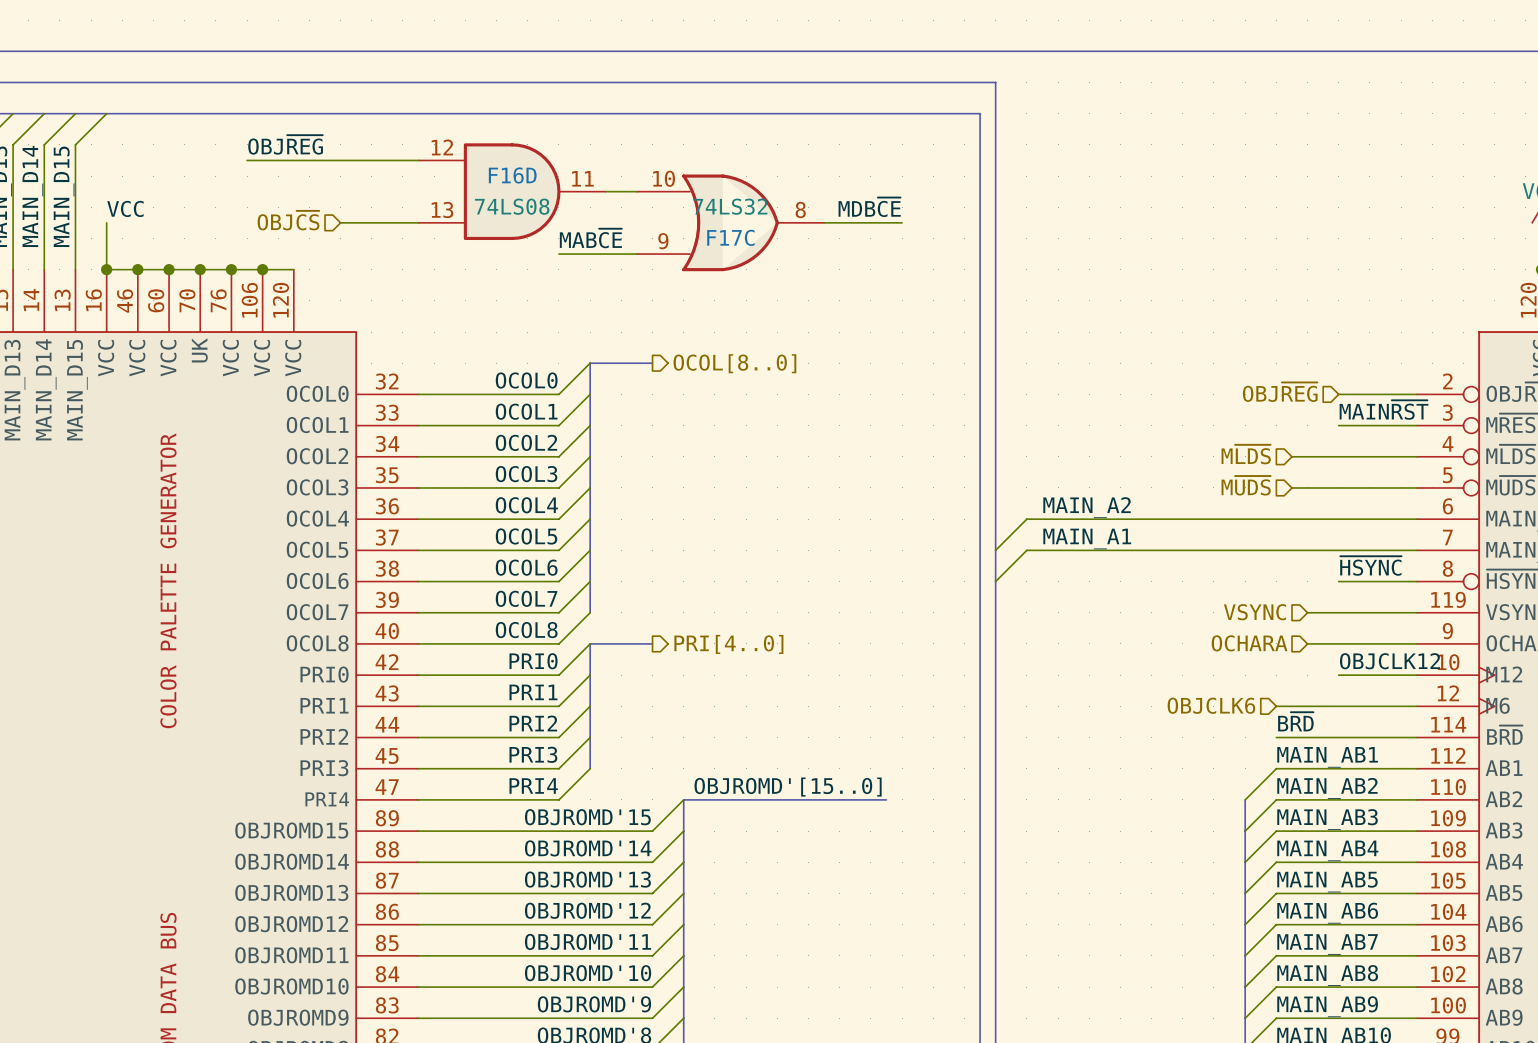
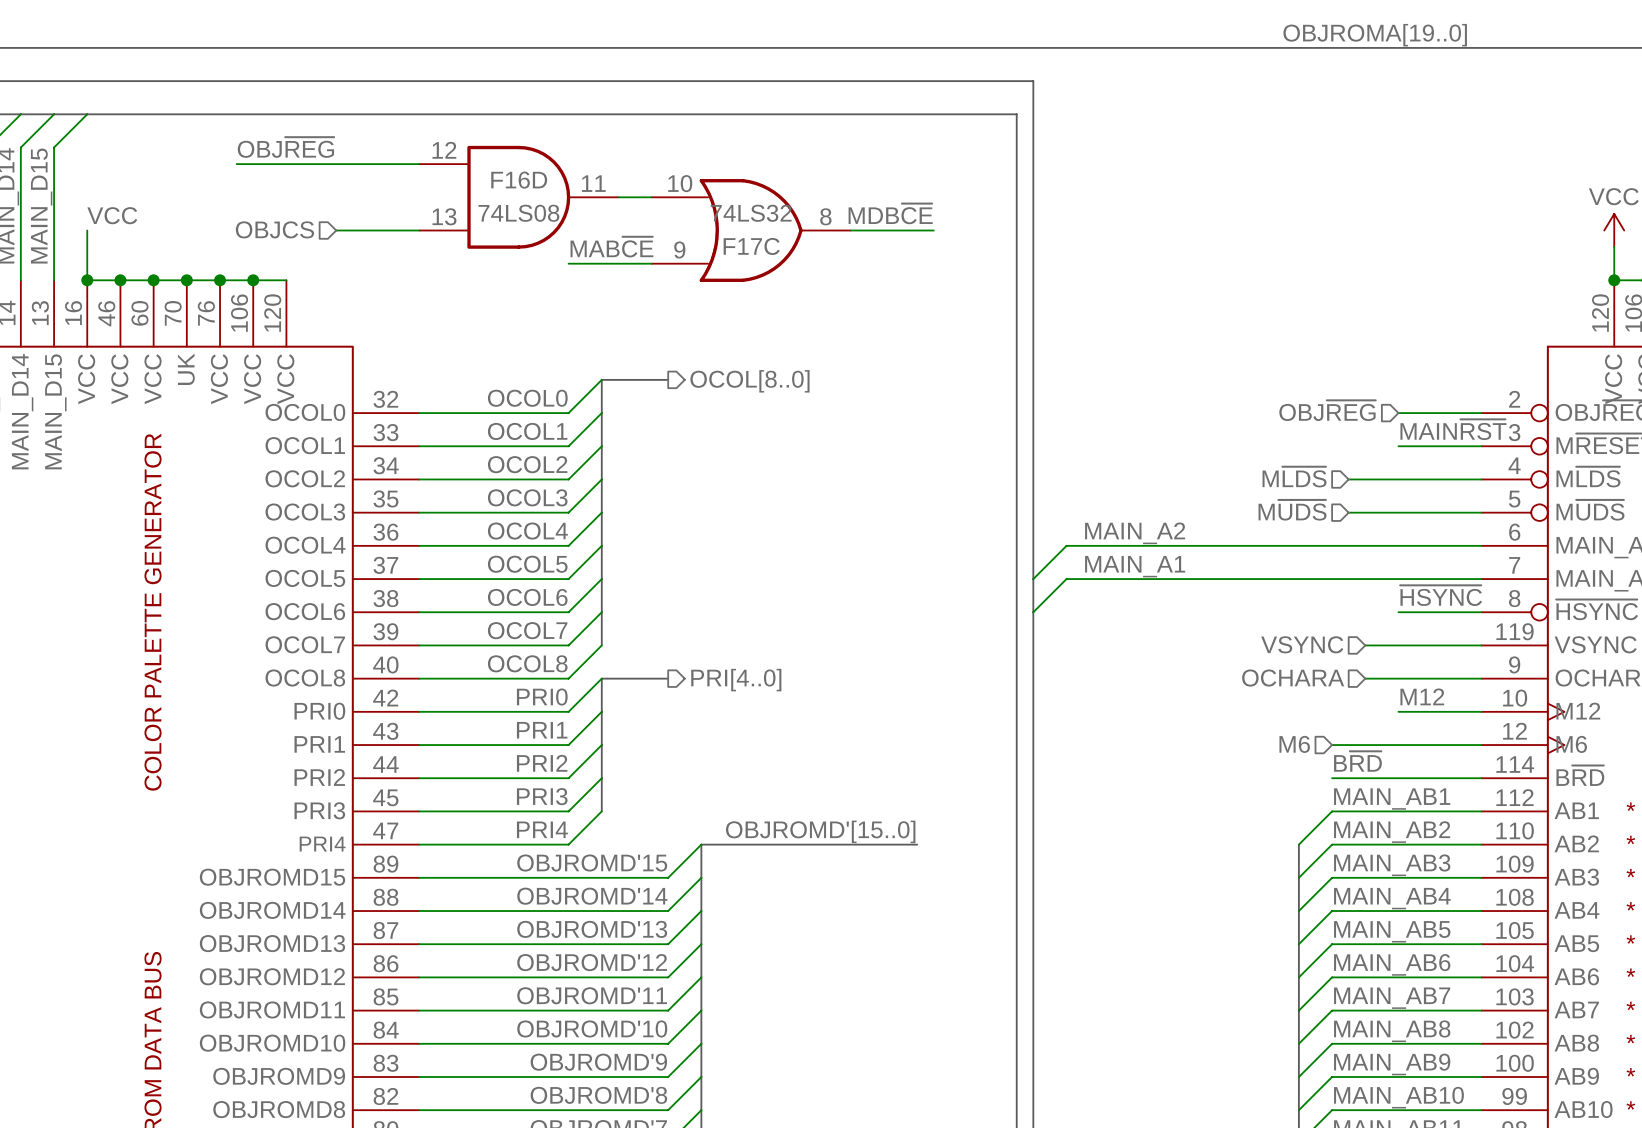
label: none -> OBJROMA[19..0] (1375, 35)
hierarchical label: OBJ~{CS} (288, 220) -> OBJCS (274, 229)
label: OBJCLK12 (1389, 661) -> M12 (1422, 696)
hierarchical label: OBJCLK6 (1211, 705) -> M6 (1294, 744)

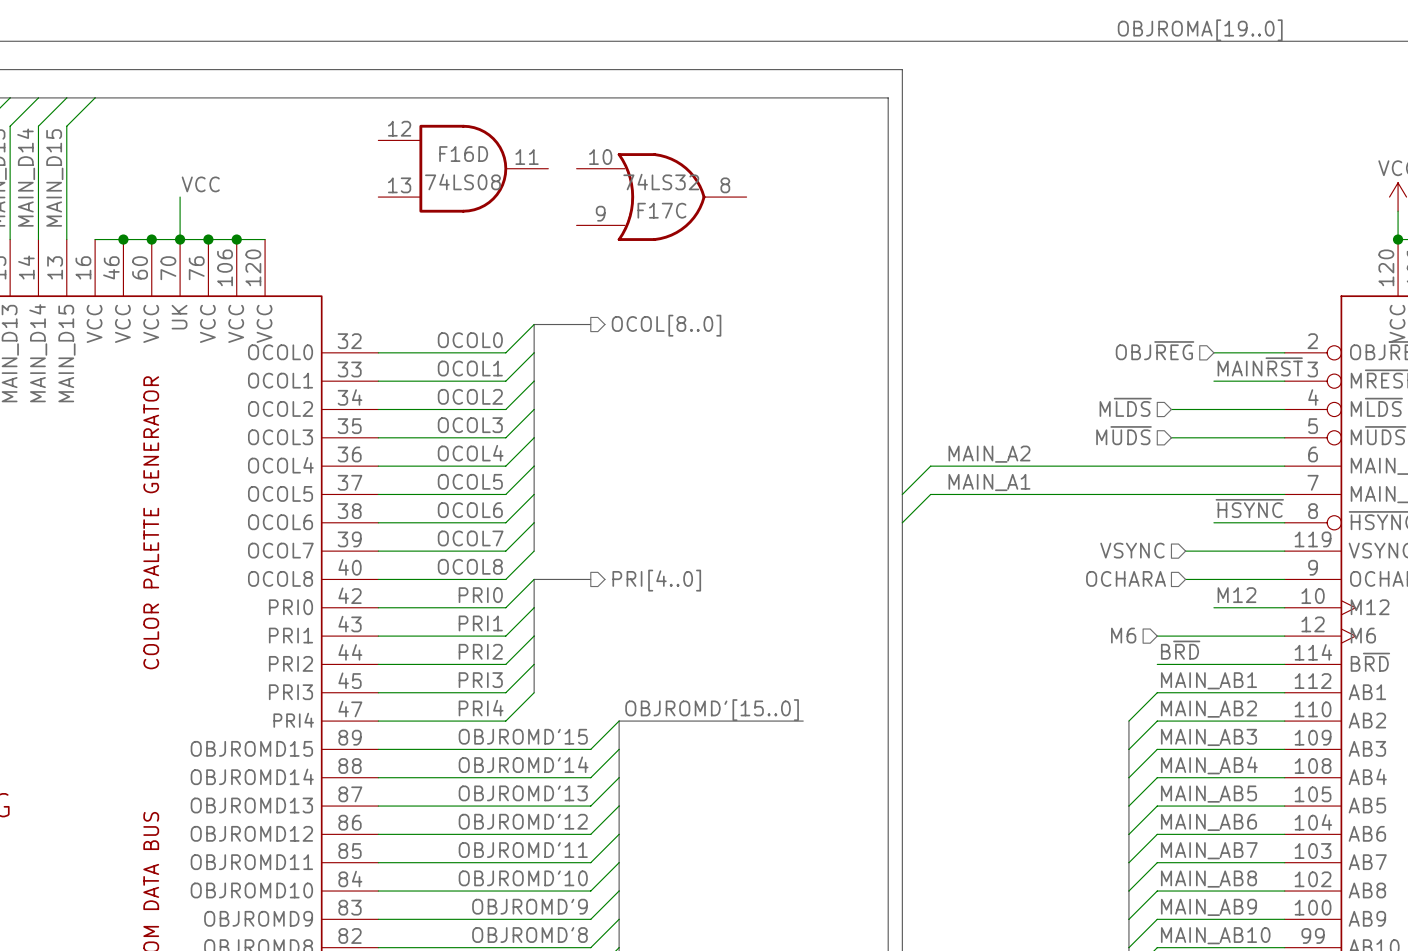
label: OBJ~{REG} (285, 147) -> none
wire: (236, 164) (419, 164) -> none
wire: (618, 197) (651, 197) -> none
label: MDB~{CE} (890, 213) -> none
label position: VCC (112, 215) -> VCC (200, 184)
hierarchical label: OBJCS (274, 229) -> none
wire: (87, 230) (87, 280) -> (180, 197) (180, 239)
wire: (336, 230) (419, 230) -> none
wire: (850, 230) (933, 230) -> none
label: MAB~{CE} (611, 247) -> none
wire: (568, 263) (651, 263) -> none
junction: (87, 280) -> none

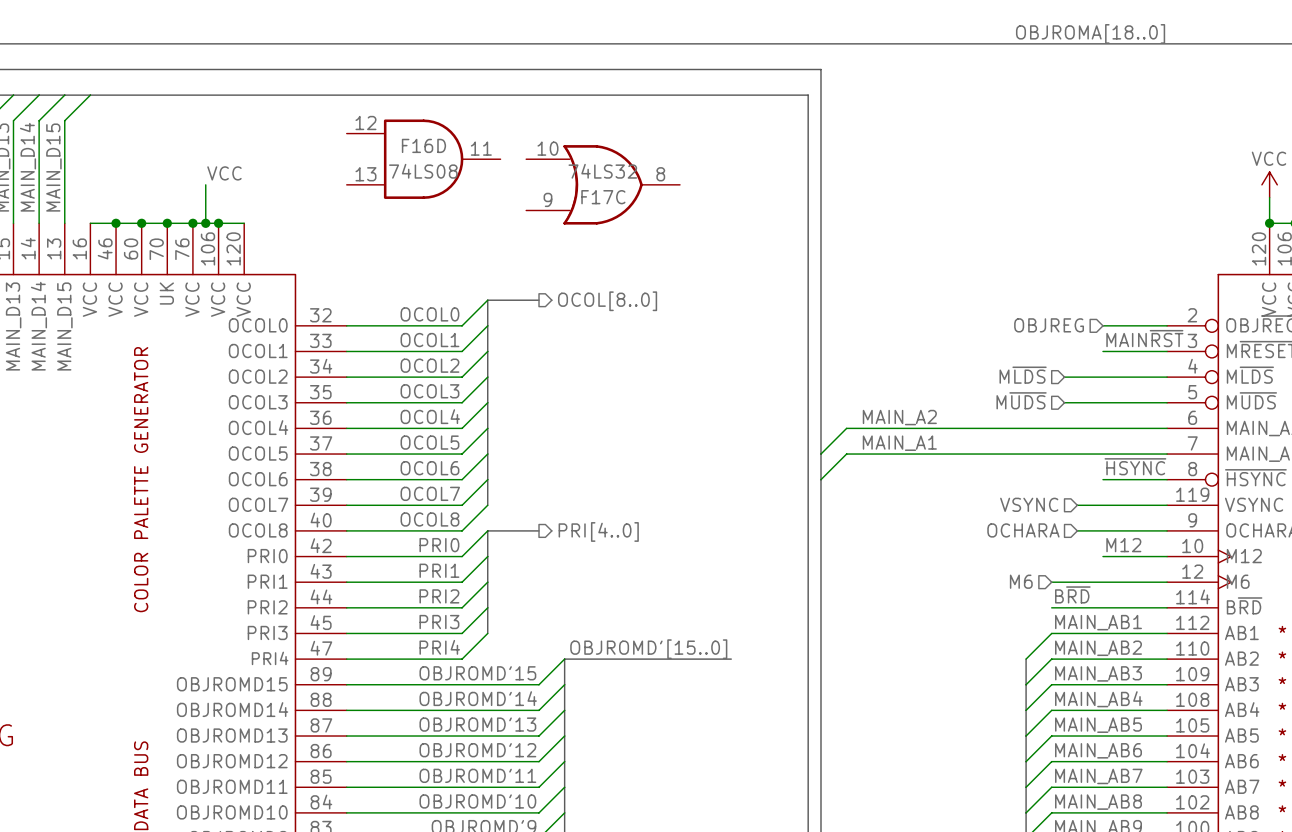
label: OBJROMA[19..0] (1200, 30) -> OBJROMA[18..0] (1090, 33)
label position: VCC (200, 184) -> VCC (224, 173)
wire: (180, 197) (180, 239) -> (205, 184) (205, 223)
junction: none -> (205, 223)
hierarchical label: OBJ~{REG} (1155, 350) -> OBJREG (1049, 325)

